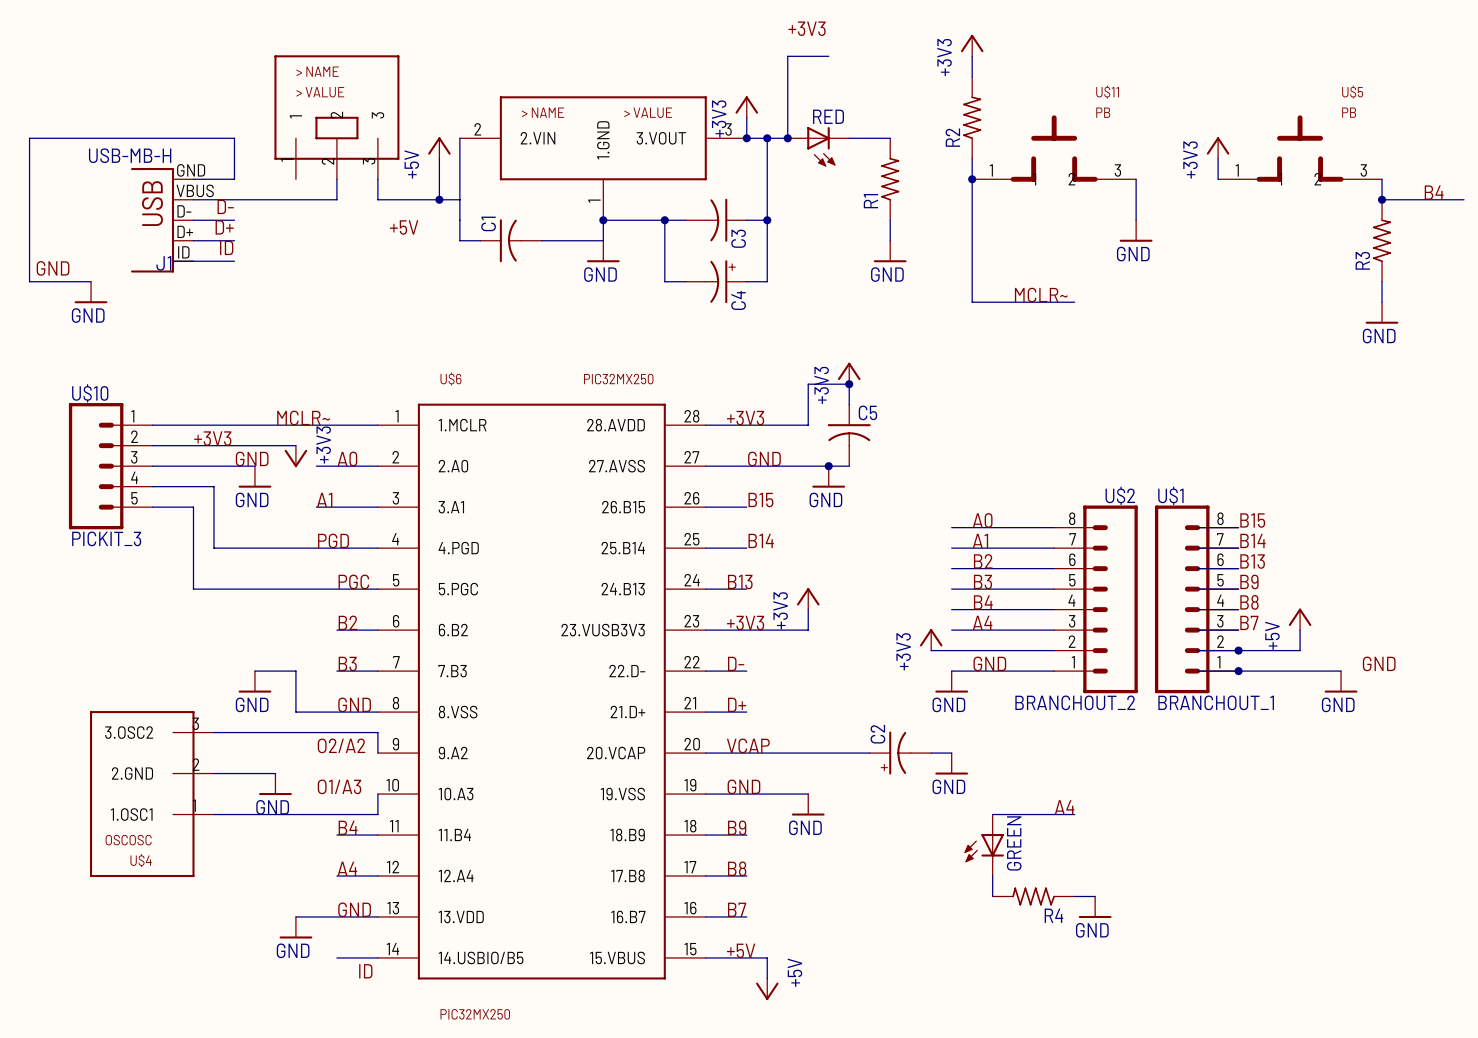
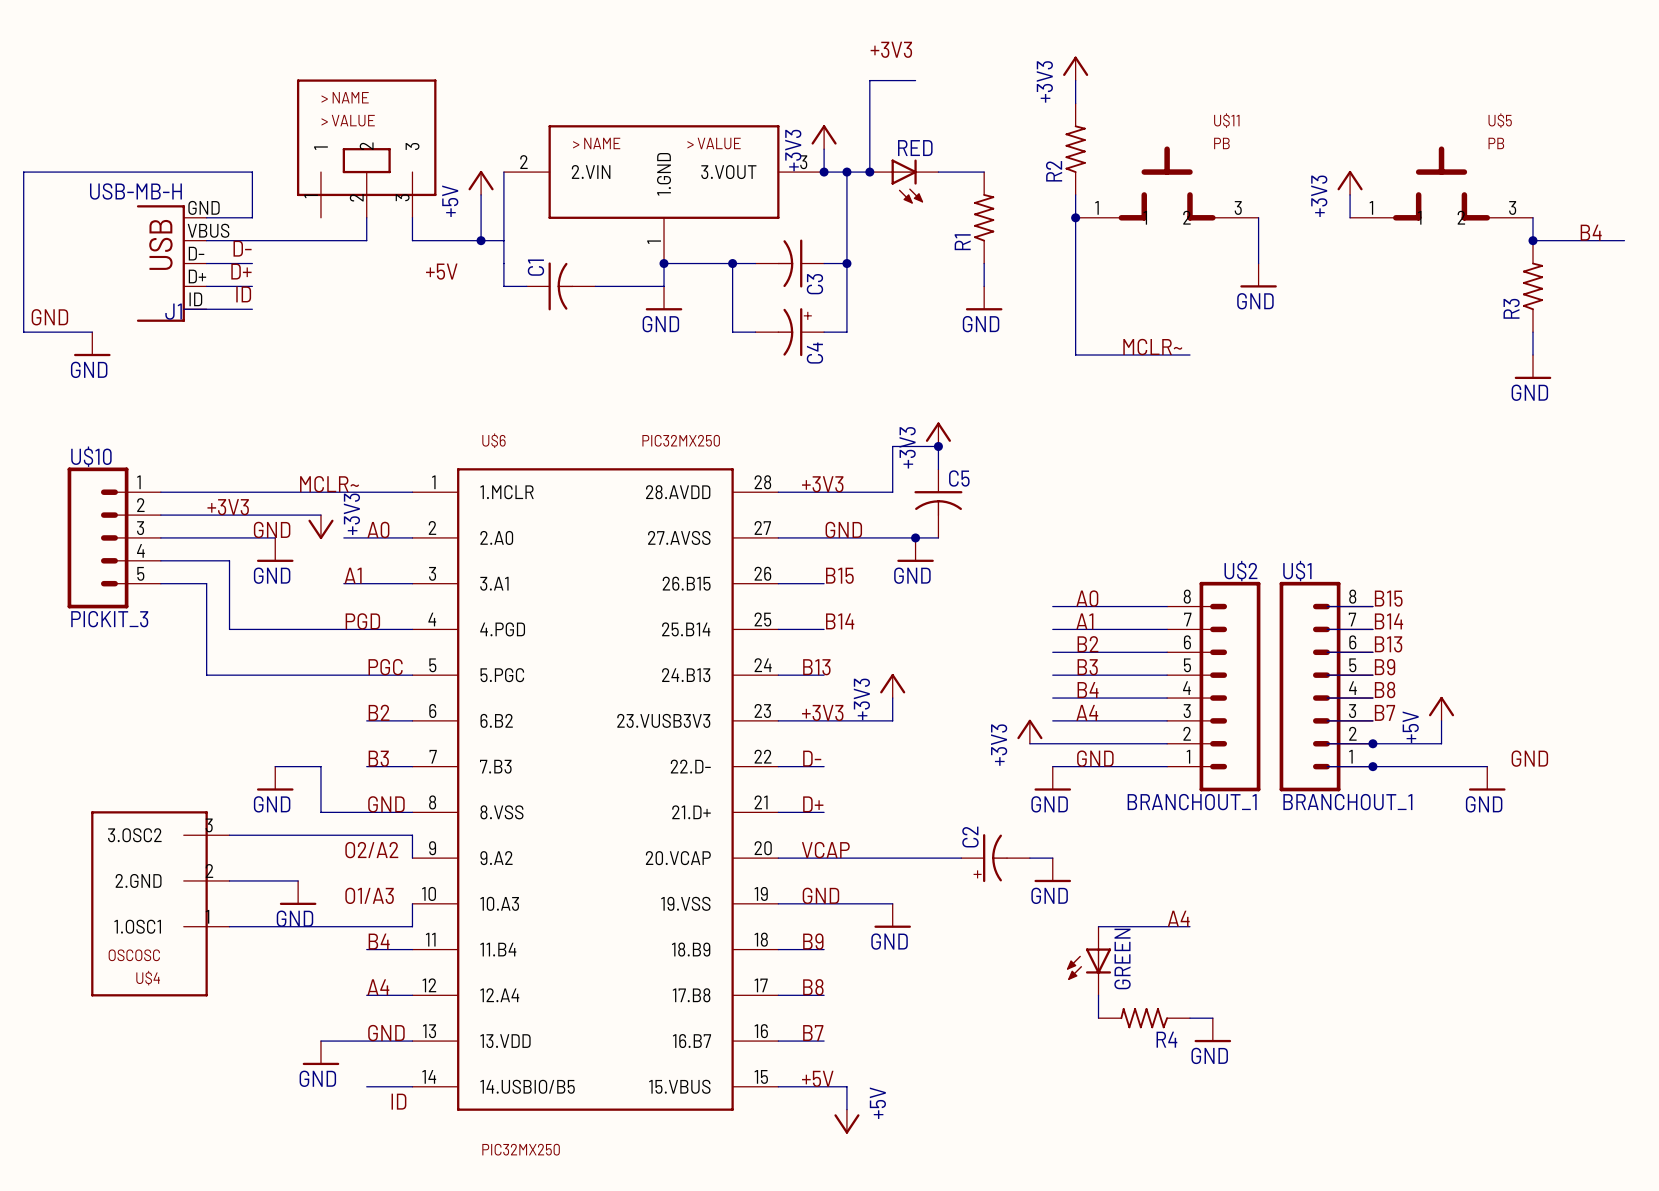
U$2 value: BRANCHOUT_2 (1075, 702) -> BRANCHOUT_1 (1192, 802)

